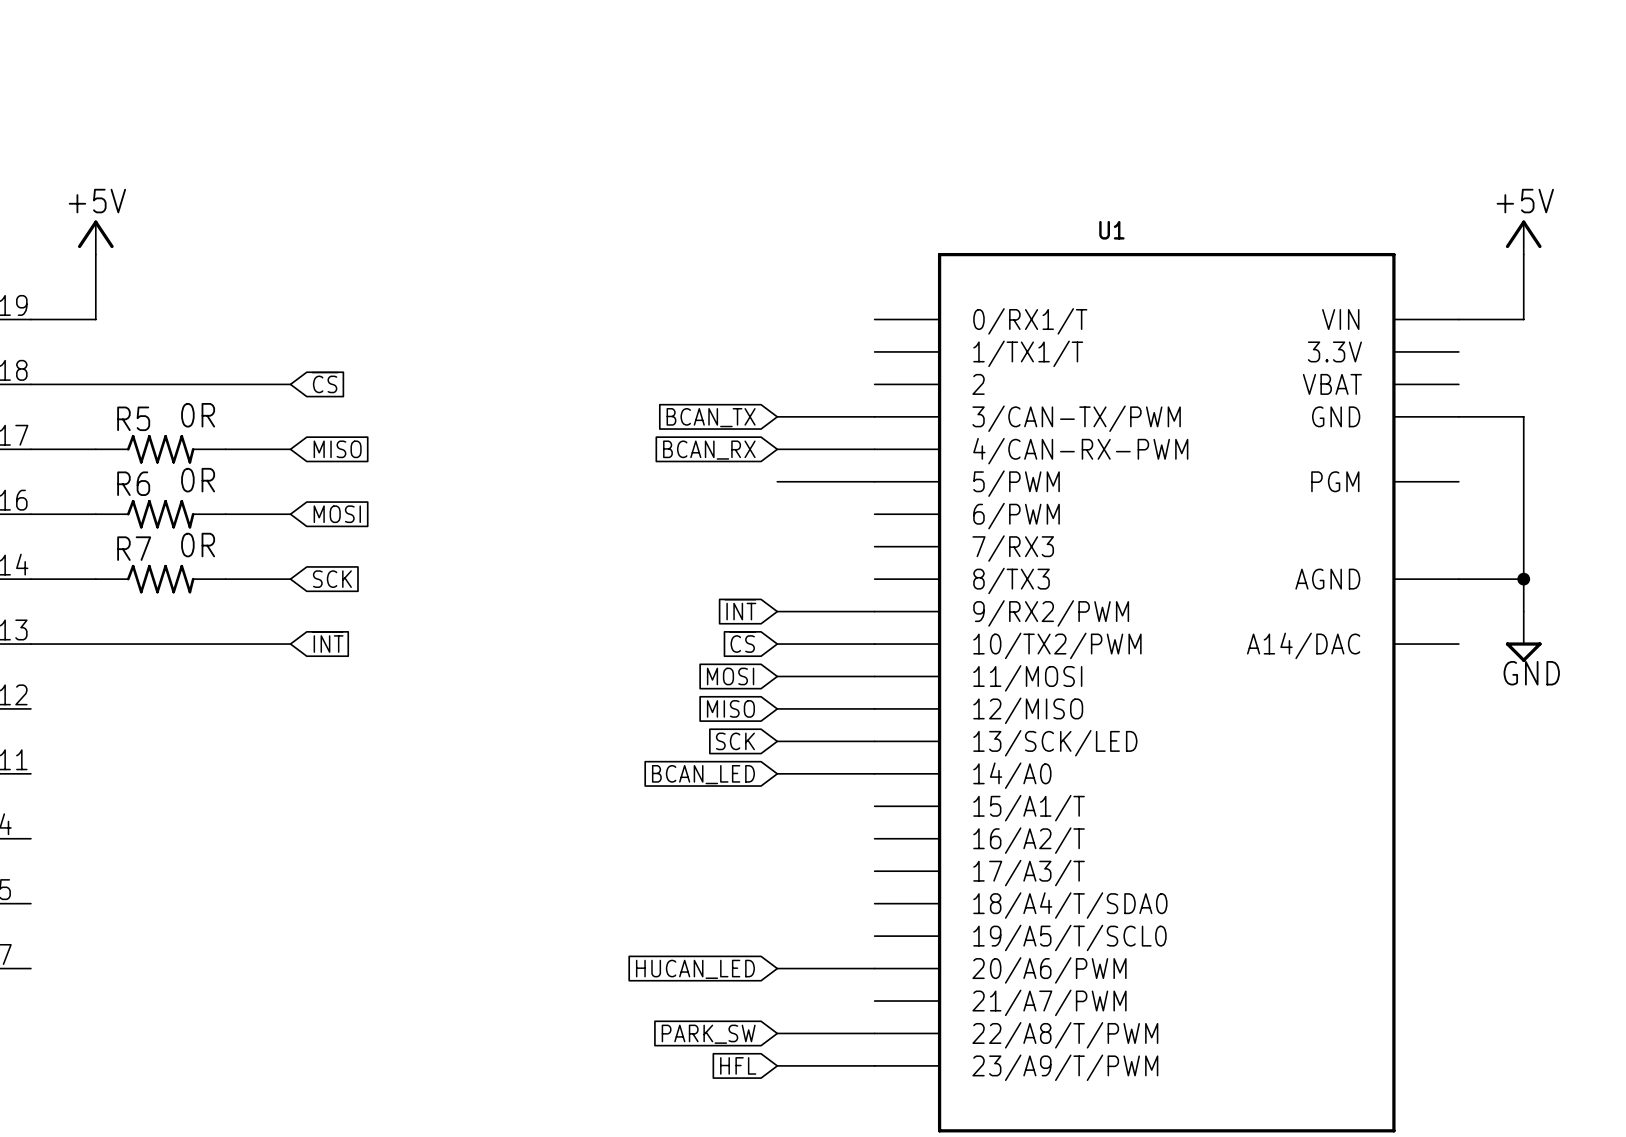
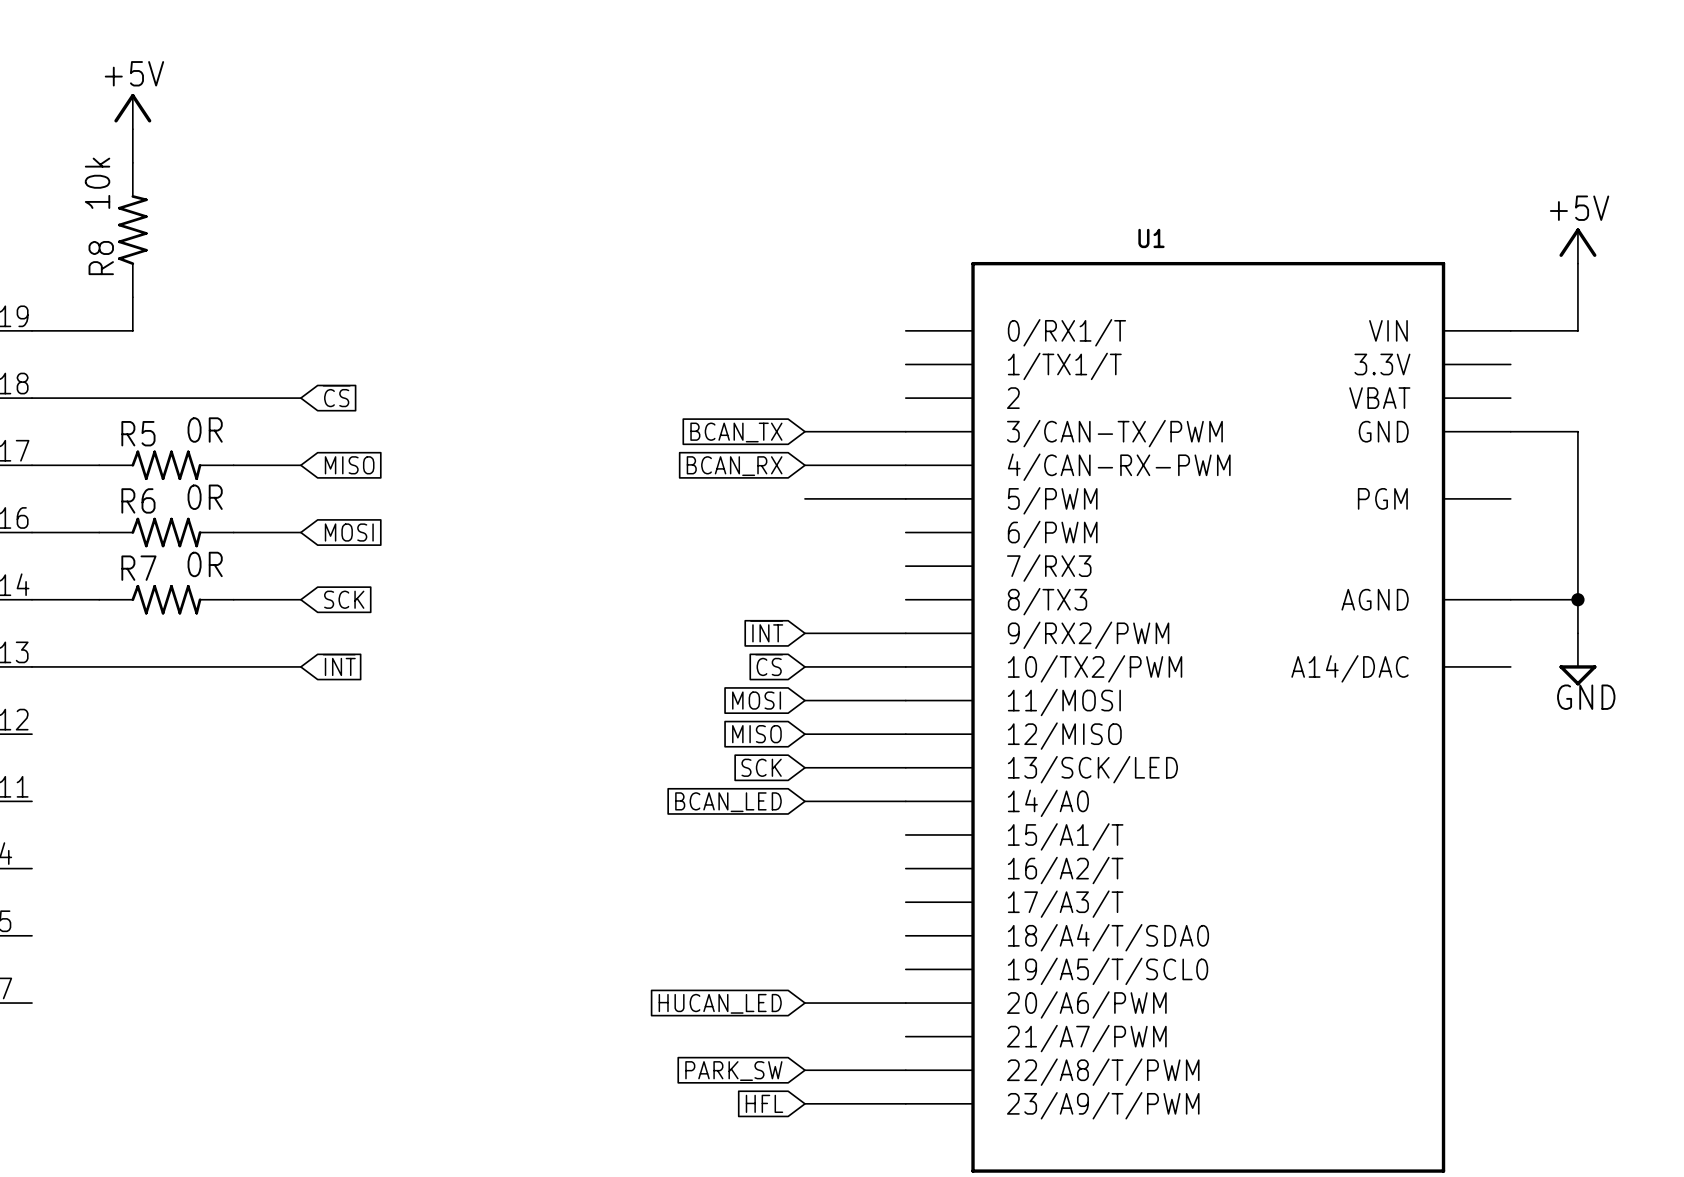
wire: none -> (132, 129) (132, 162)
R8: none -> 10k (132, 230)
power symbol position: +5V (95, 237) -> +5V (132, 111)
wire: (95, 254) (95, 319) -> (132, 297) (132, 330) (99, 330)

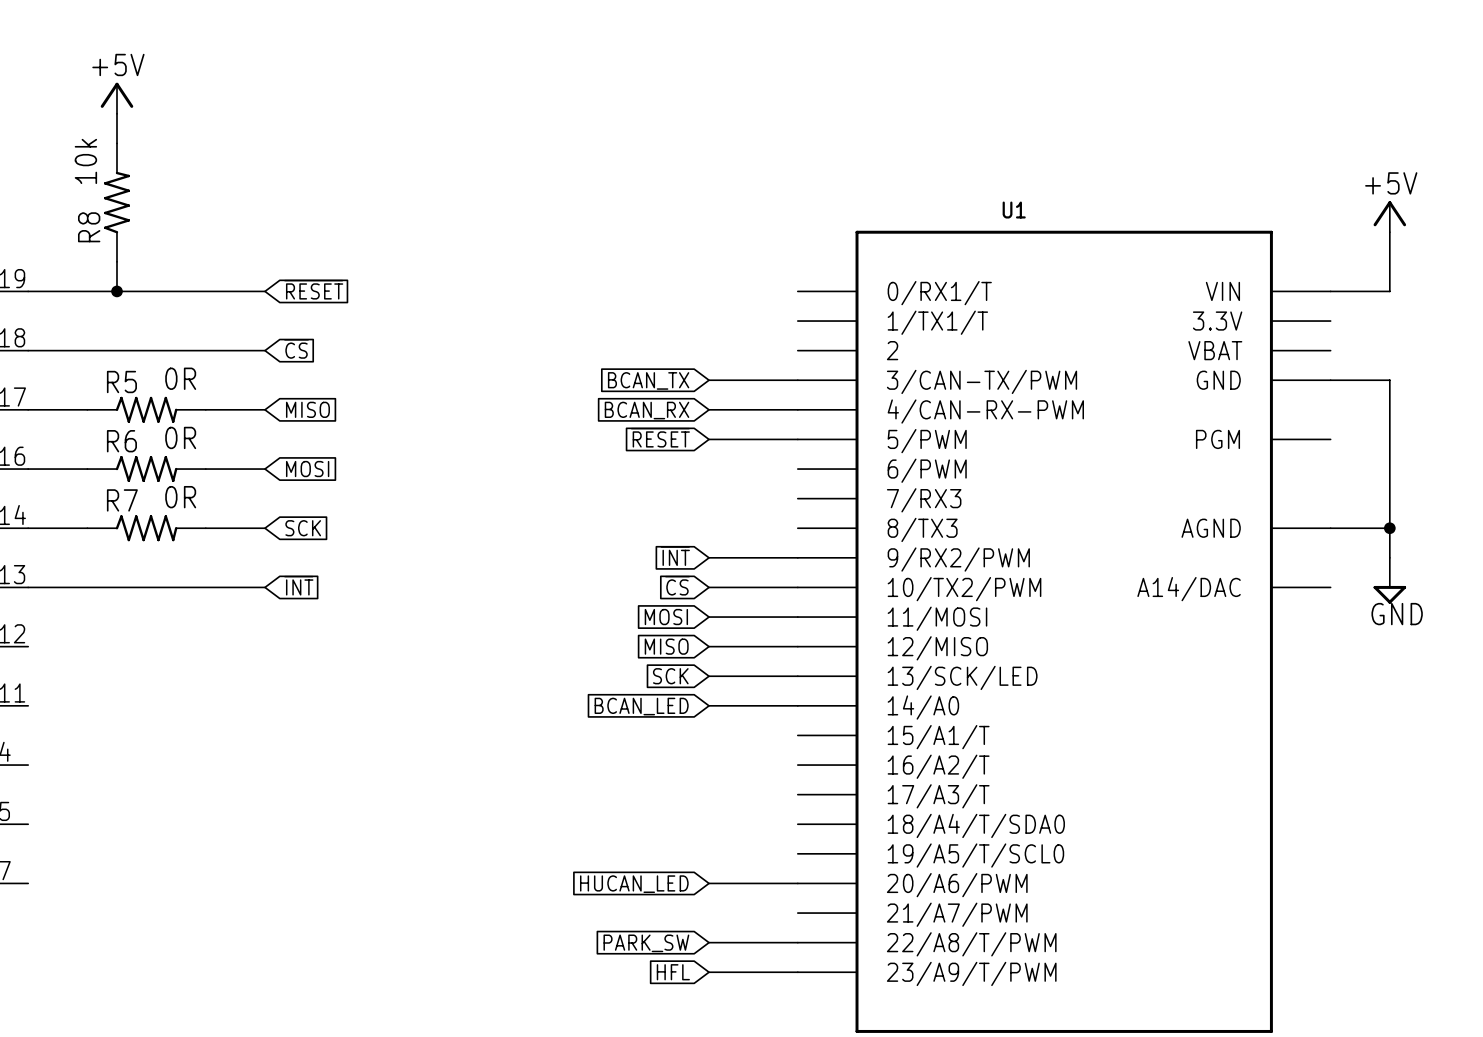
global label: none -> ~{RESET} (313, 289)
wire: none -> (116, 291) (265, 291)
junction: none -> (116, 291)
global label: none -> ~{RESET} (660, 437)

